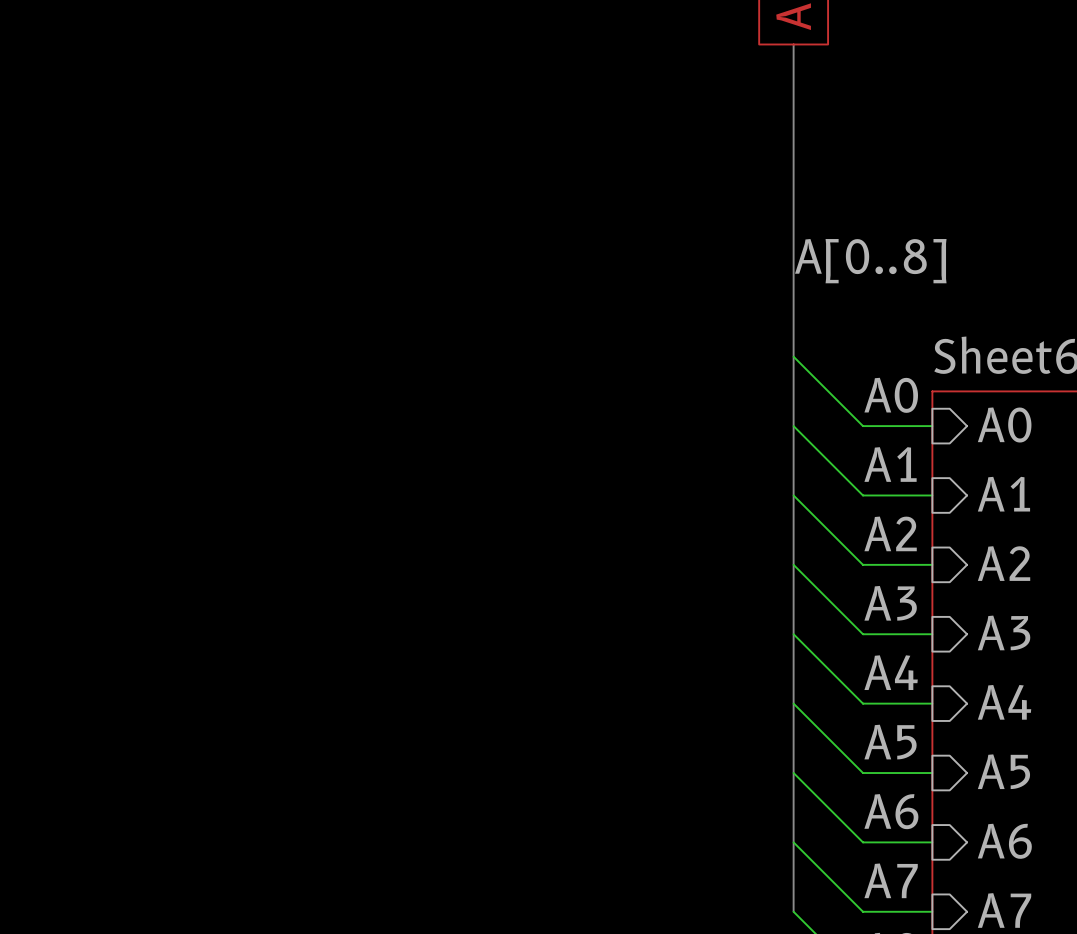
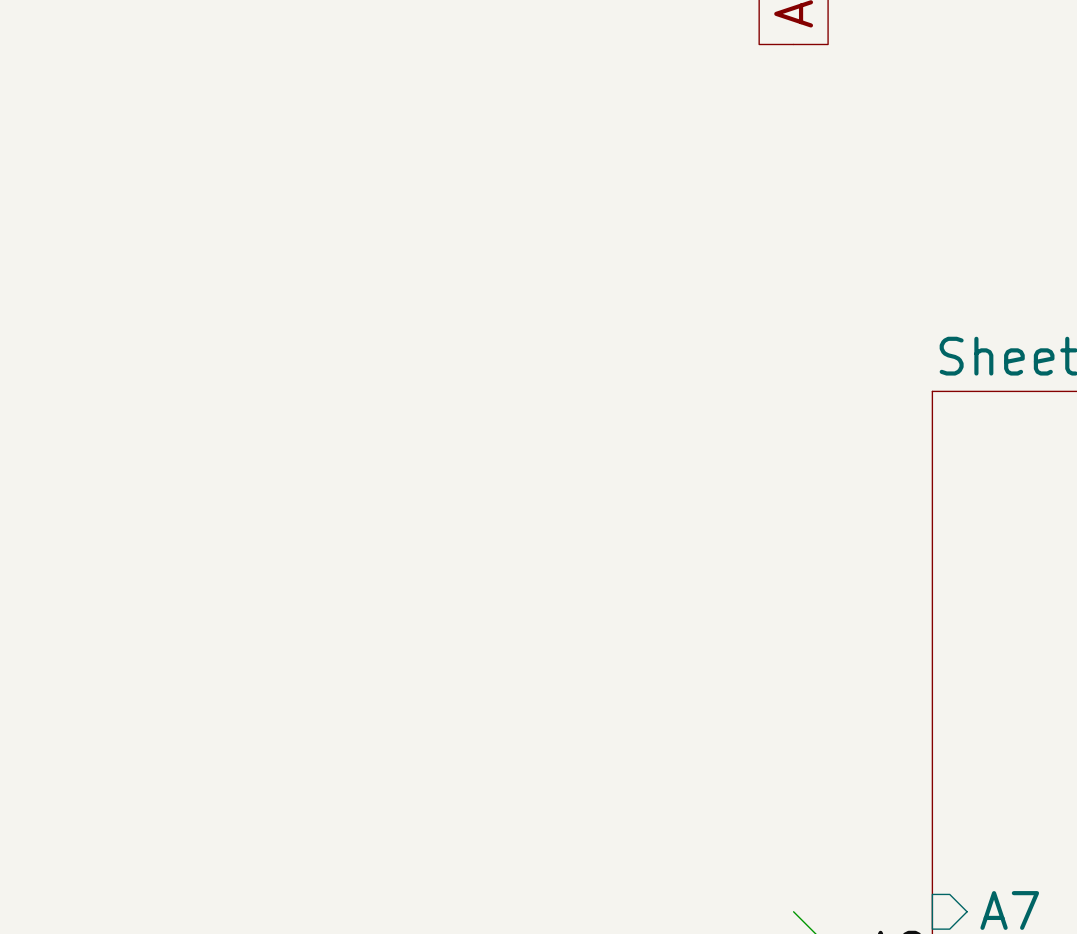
bus: (793, 44) (793, 911) -> none
label: A[0..8] (870, 261) -> none
wire: (793, 356) (863, 426) (932, 426) -> none
label: A0 (891, 395) -> none
sheet pin: A0 (1004, 424) -> none
wire: (793, 426) (863, 495) (932, 495) -> none
label: A1 (890, 464) -> none
sheet pin: A1 (1003, 494) -> none
wire: (793, 495) (863, 564) (932, 564) -> none
label: A2 (890, 533) -> none
sheet pin: A2 (1004, 563) -> none
wire: (793, 564) (863, 634) (932, 634) -> none
label: A3 (890, 603) -> none
sheet pin: A3 (1004, 632) -> none
wire: (793, 634) (863, 703) (932, 703) -> none
label: A4 (891, 672) -> none
sheet pin: A4 (1004, 702) -> none
wire: (793, 703) (863, 773) (932, 773) -> none
label: A5 (890, 742) -> none
sheet pin: A5 (1003, 771) -> none
wire: (793, 773) (863, 842) (932, 842) -> none
label: A6 (891, 811) -> none
sheet pin: A6 (1004, 841) -> none
wire: (793, 842) (863, 911) (932, 911) -> none
label: A7 (891, 880) -> none

